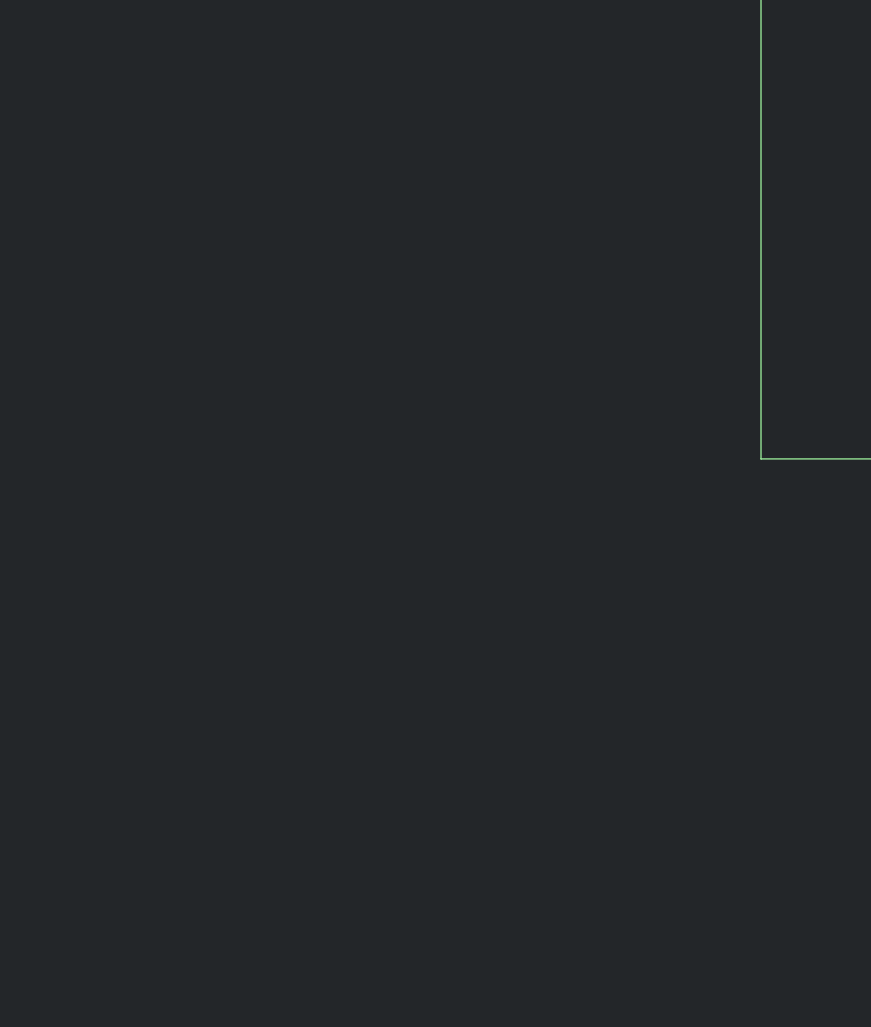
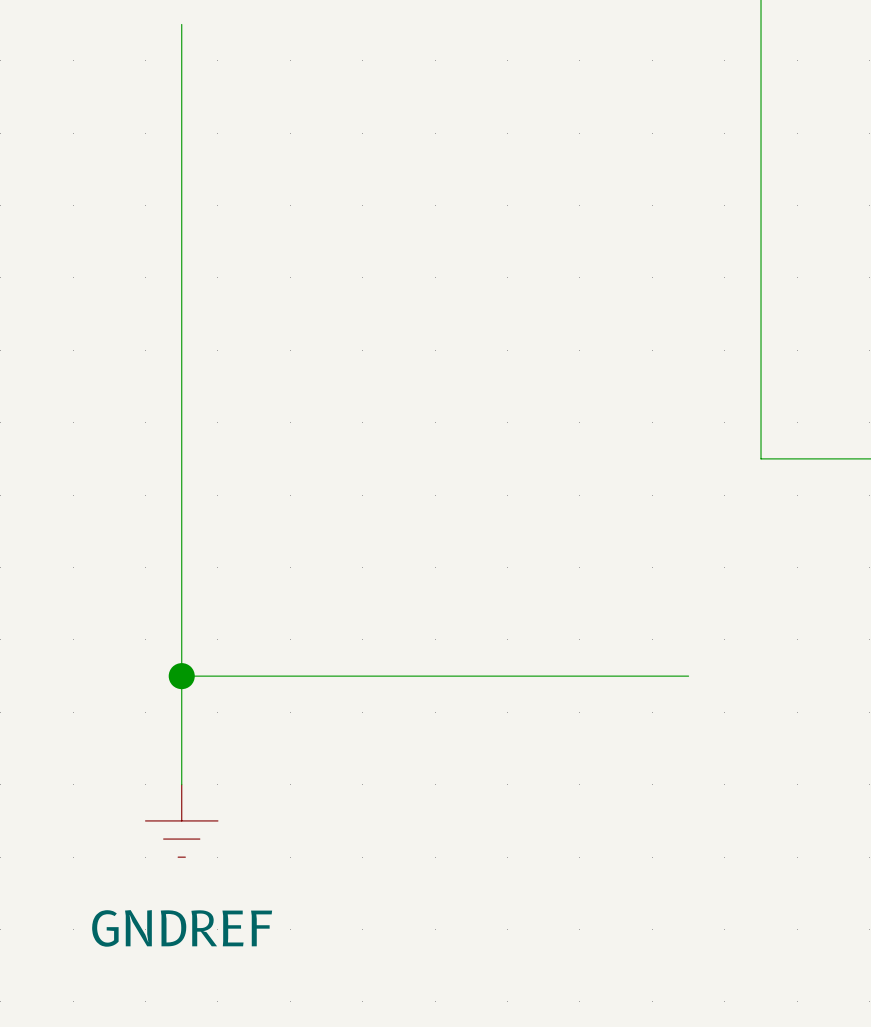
wire: none -> (181, 24) (181, 784)
wire: none -> (181, 676) (688, 676)
junction: none -> (181, 676)
power symbol: none -> GNDREF (181, 820)

